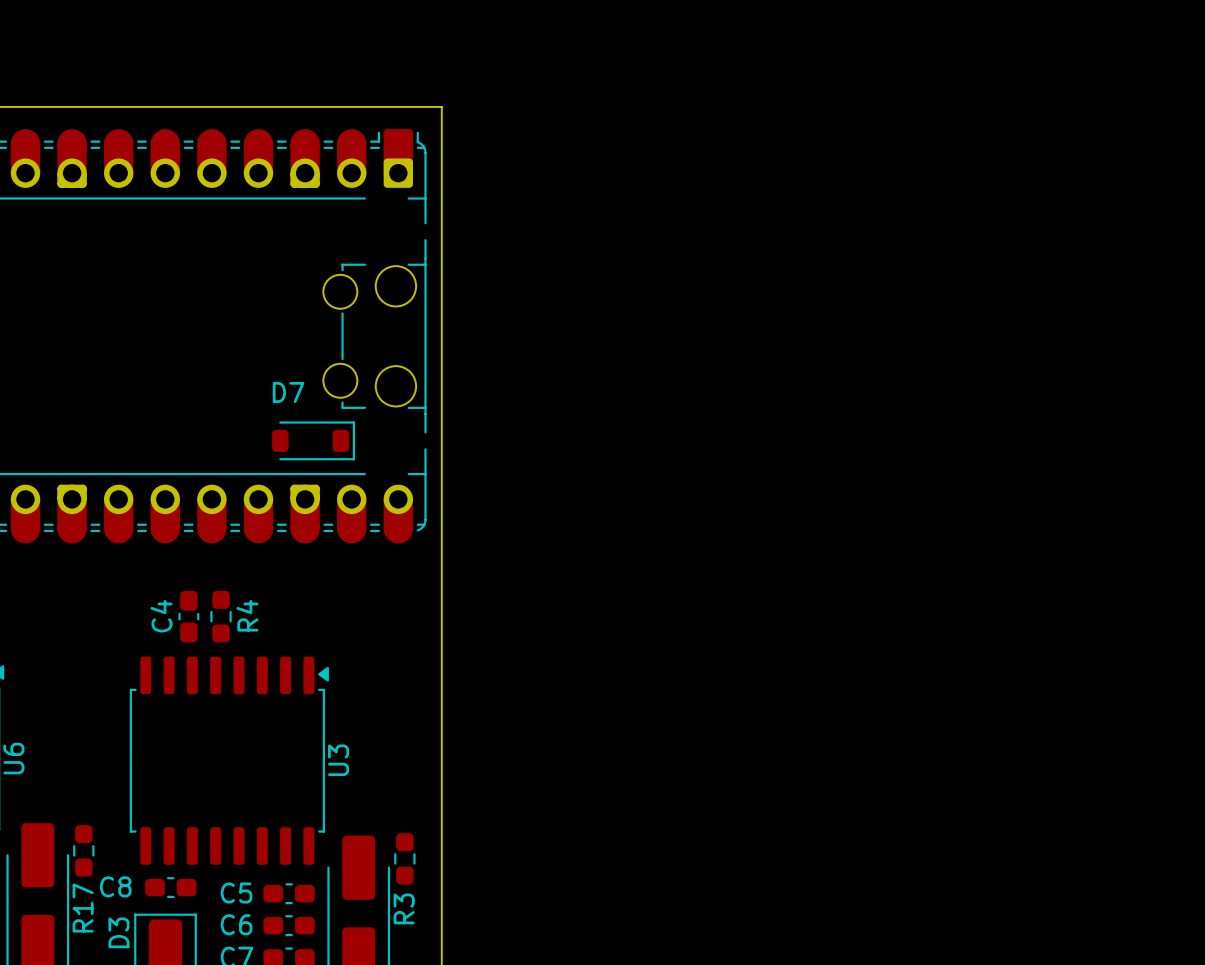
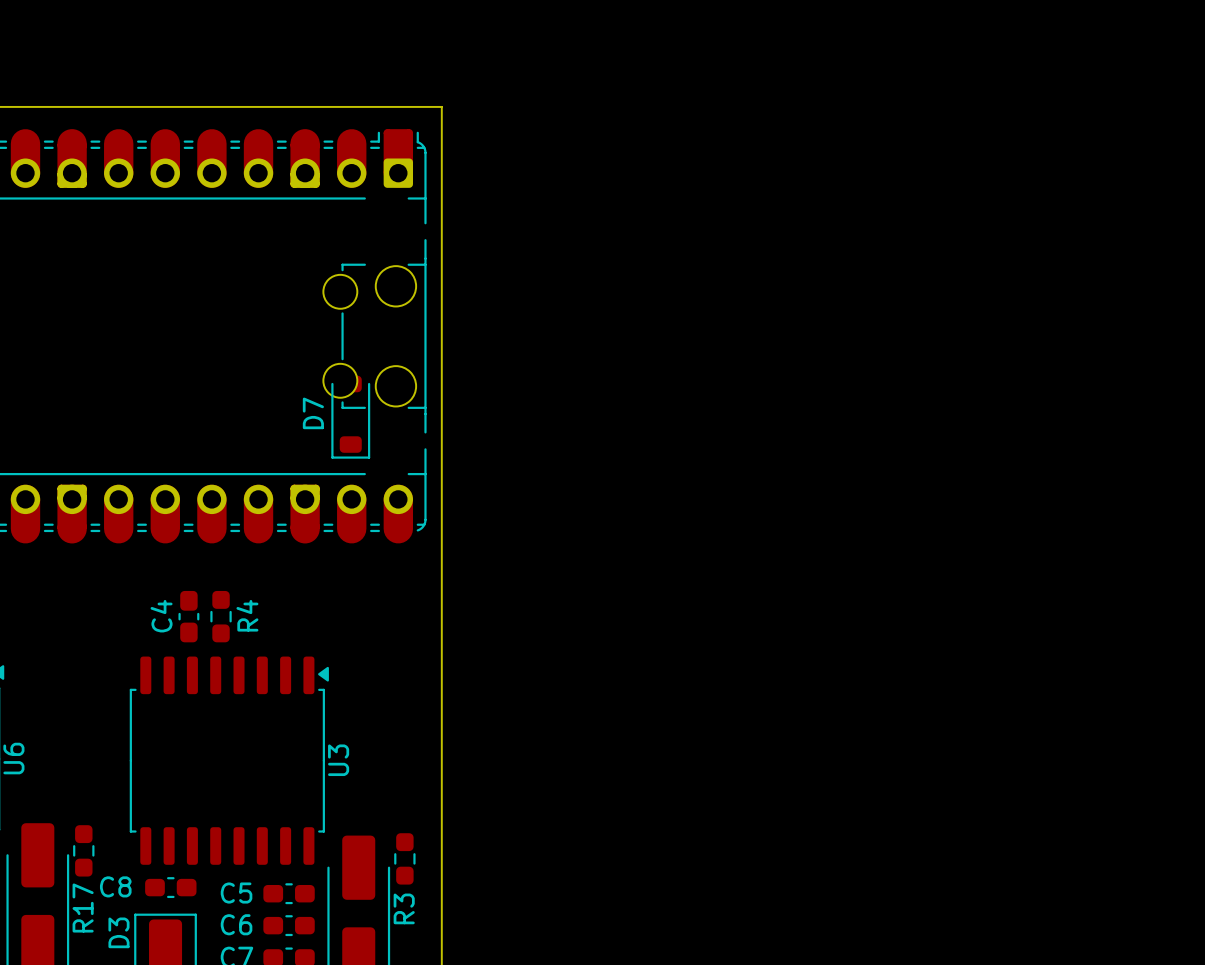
D7 name position: D7 (288, 392) -> D7 (313, 413)
D7 rotation: 0° (313, 440) -> 90° clockwise (350, 417)

